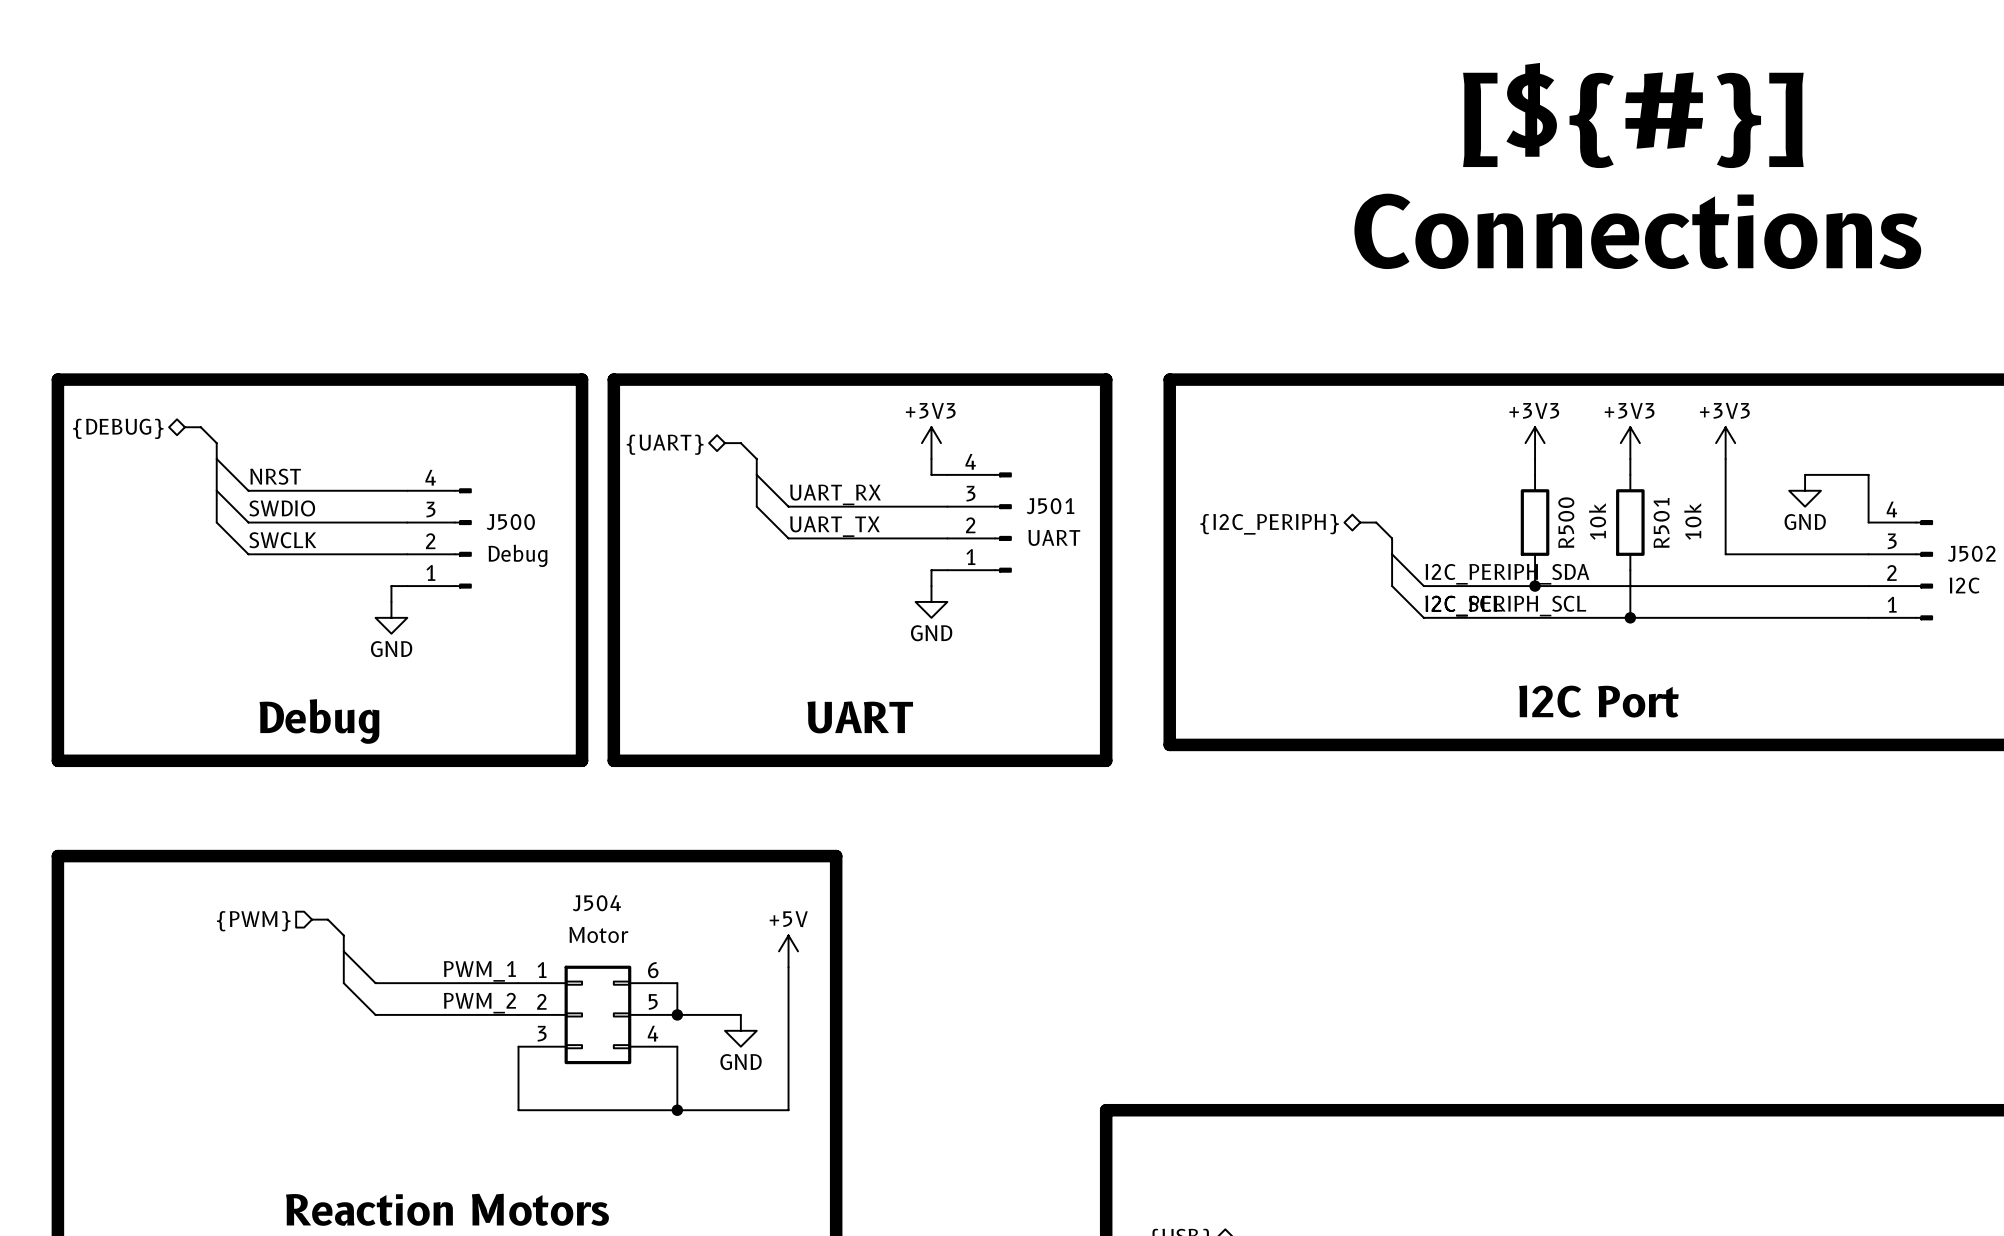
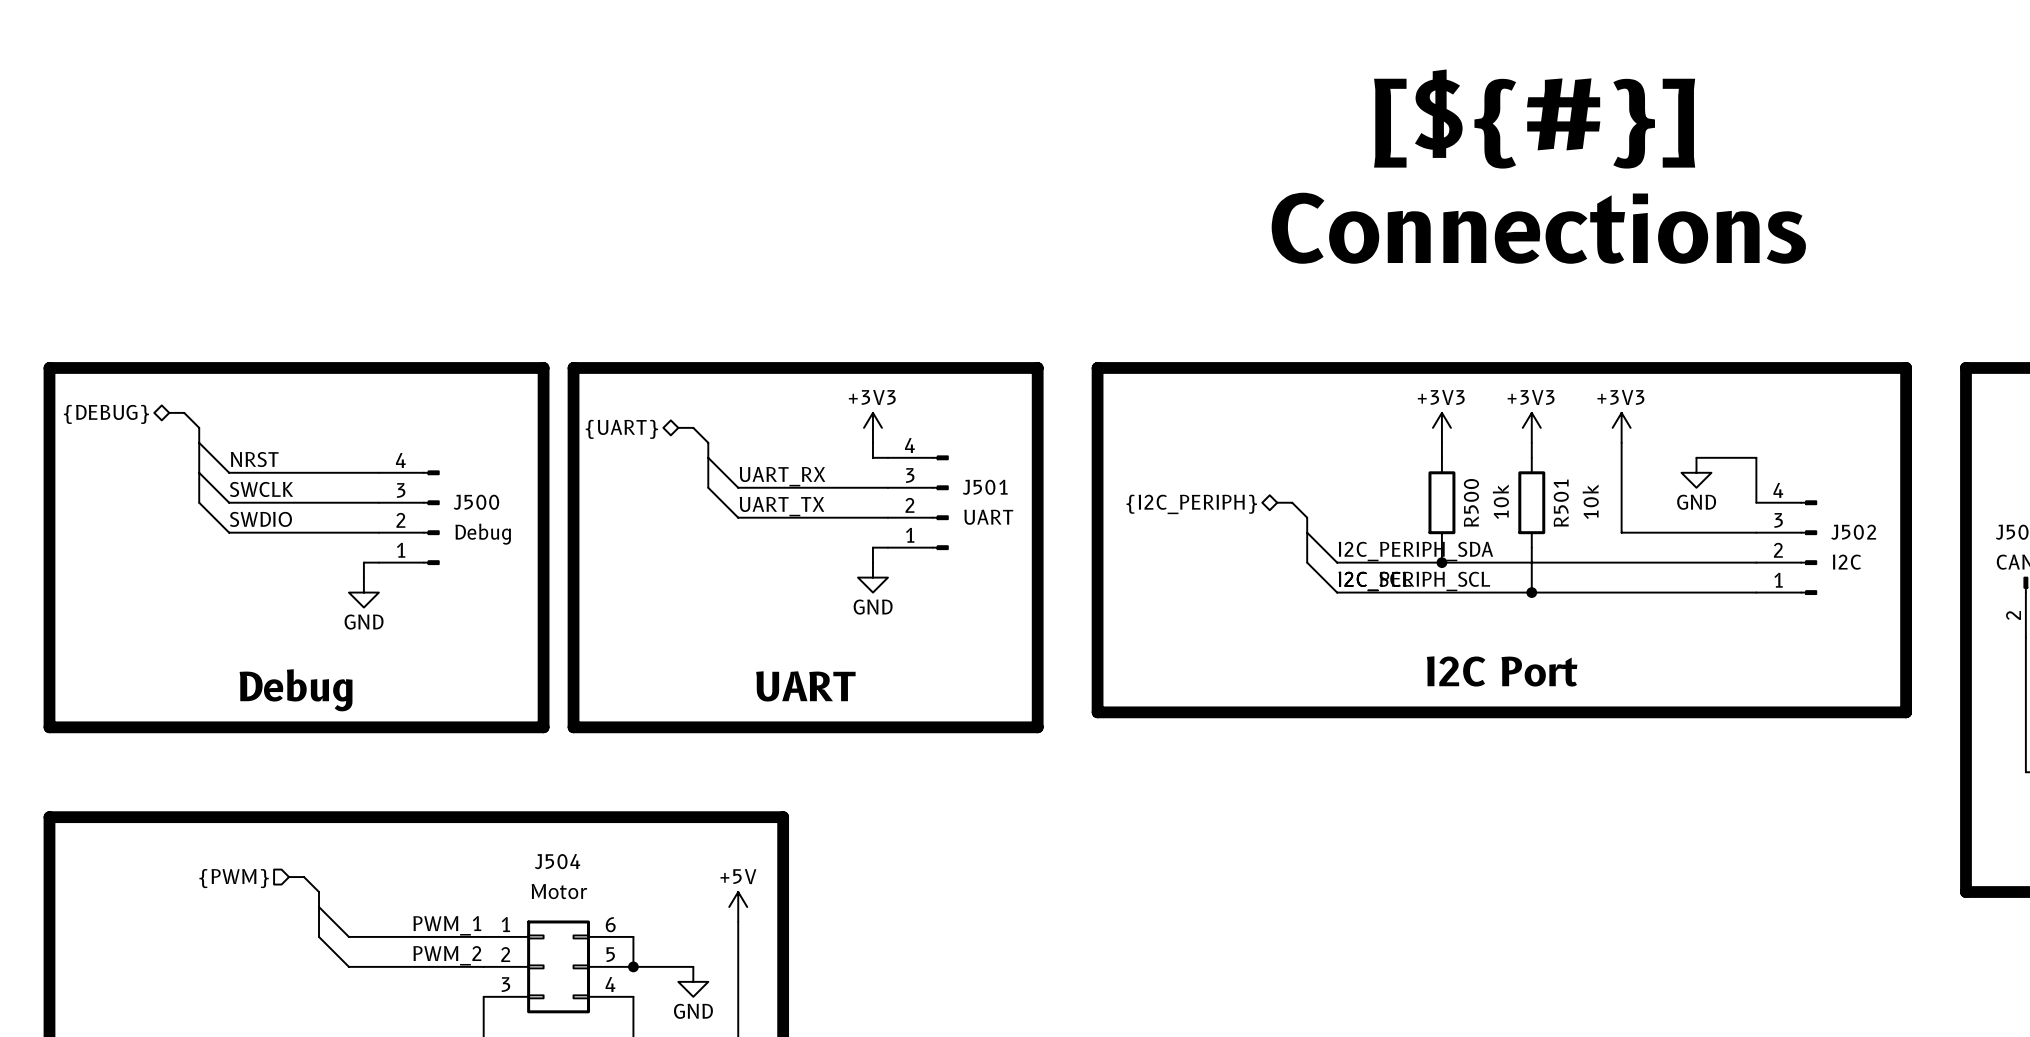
label: SWDIO (282, 508) -> SWCLK (261, 489)
label: SWCLK (282, 540) -> SWDIO (260, 519)

